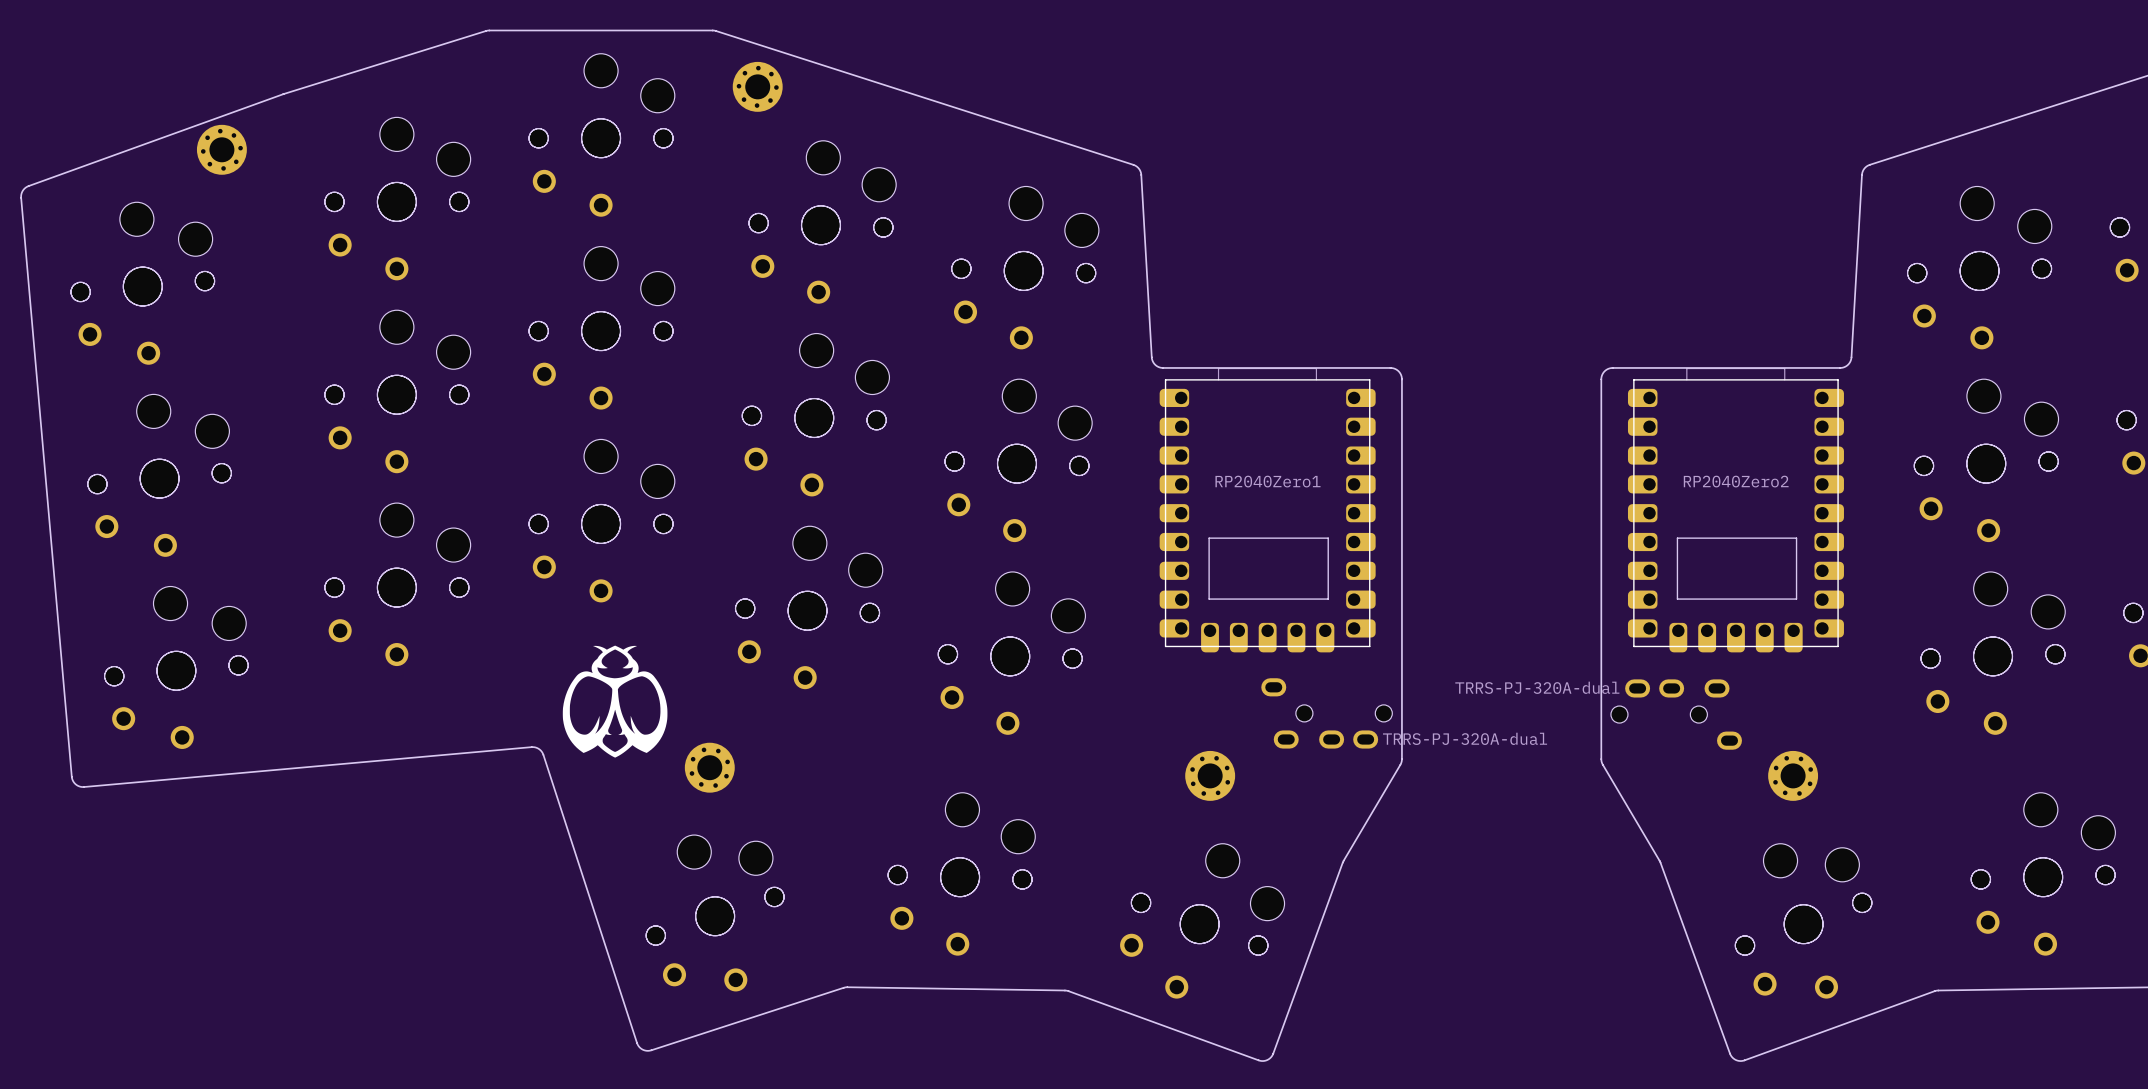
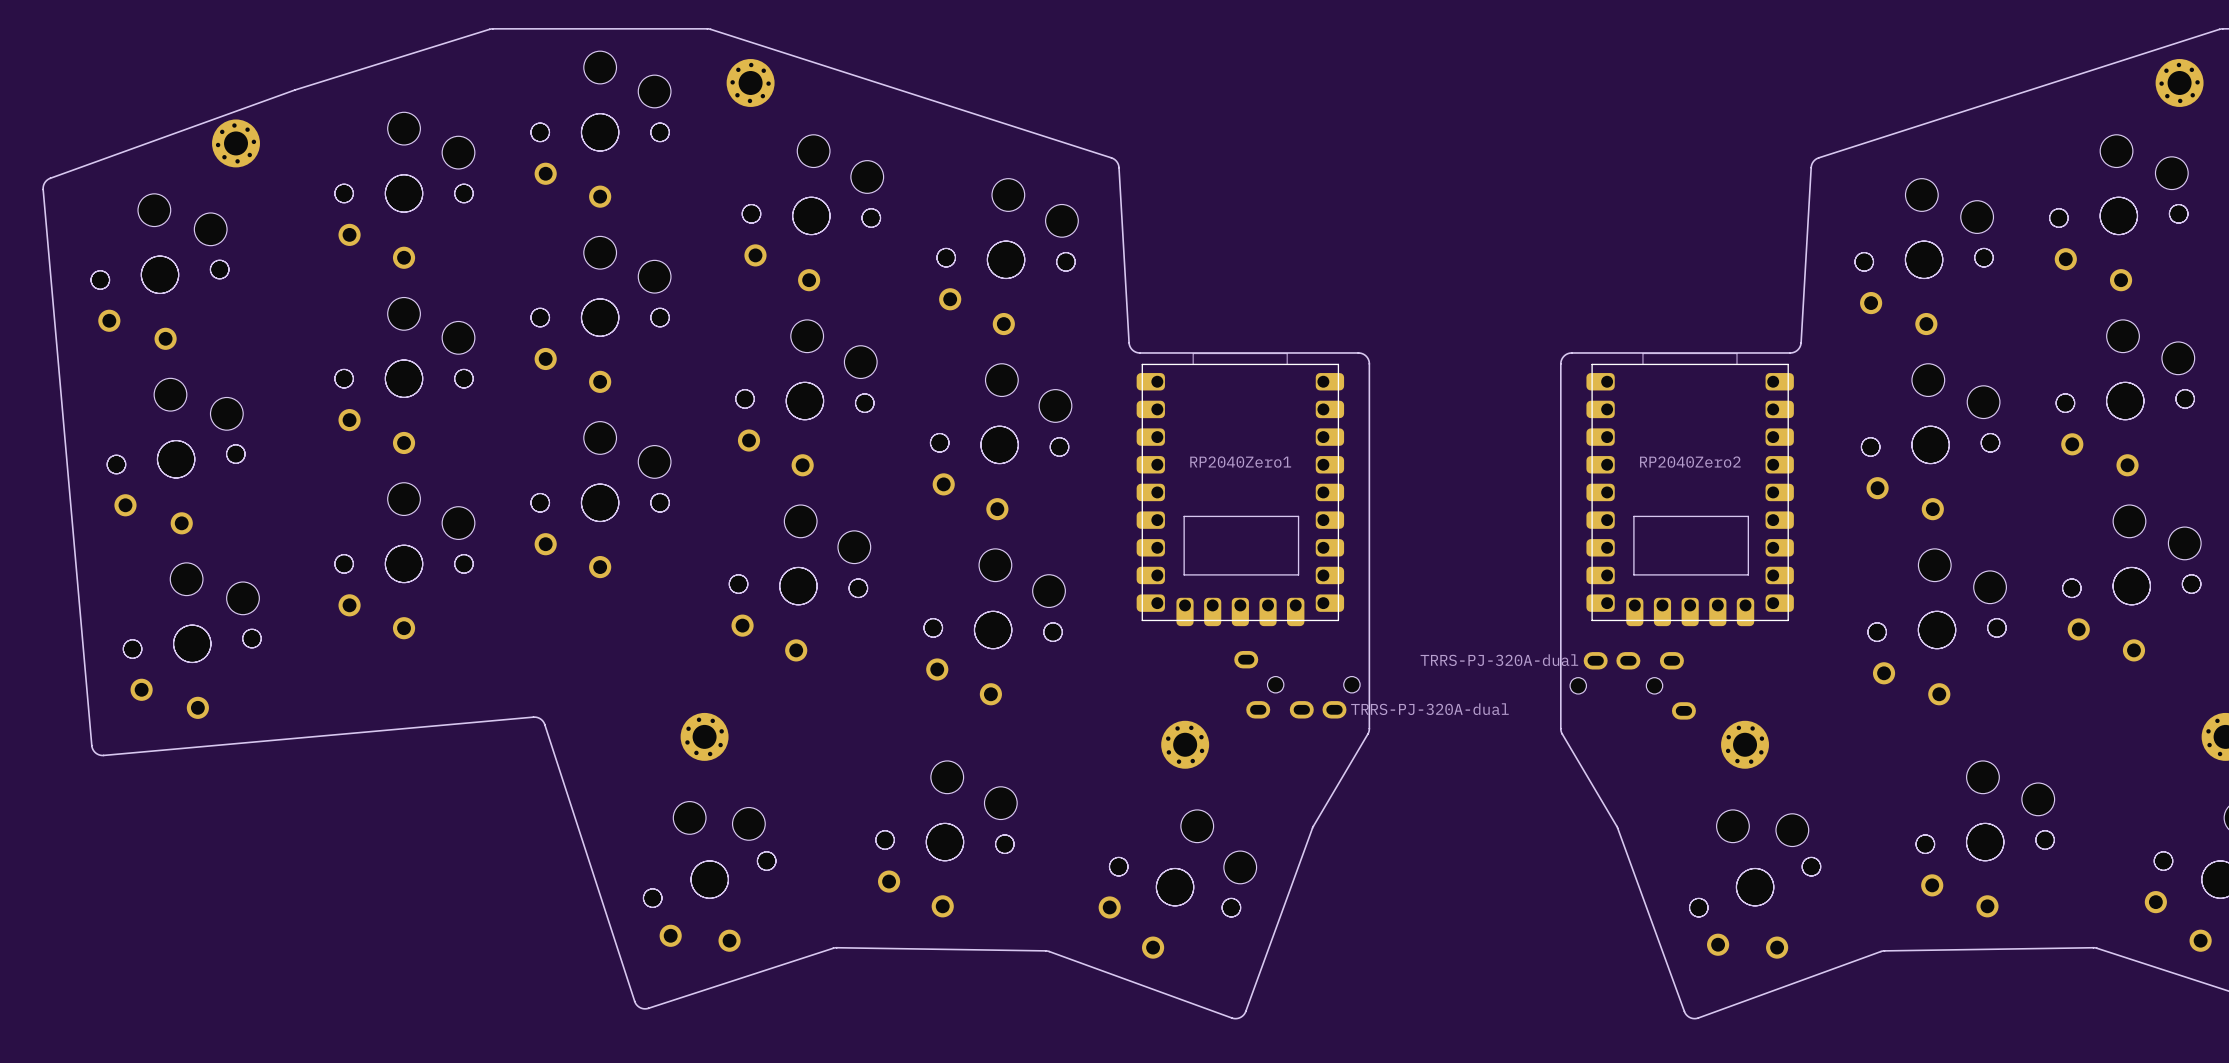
drawing: [562, 645, 668, 758] -> none

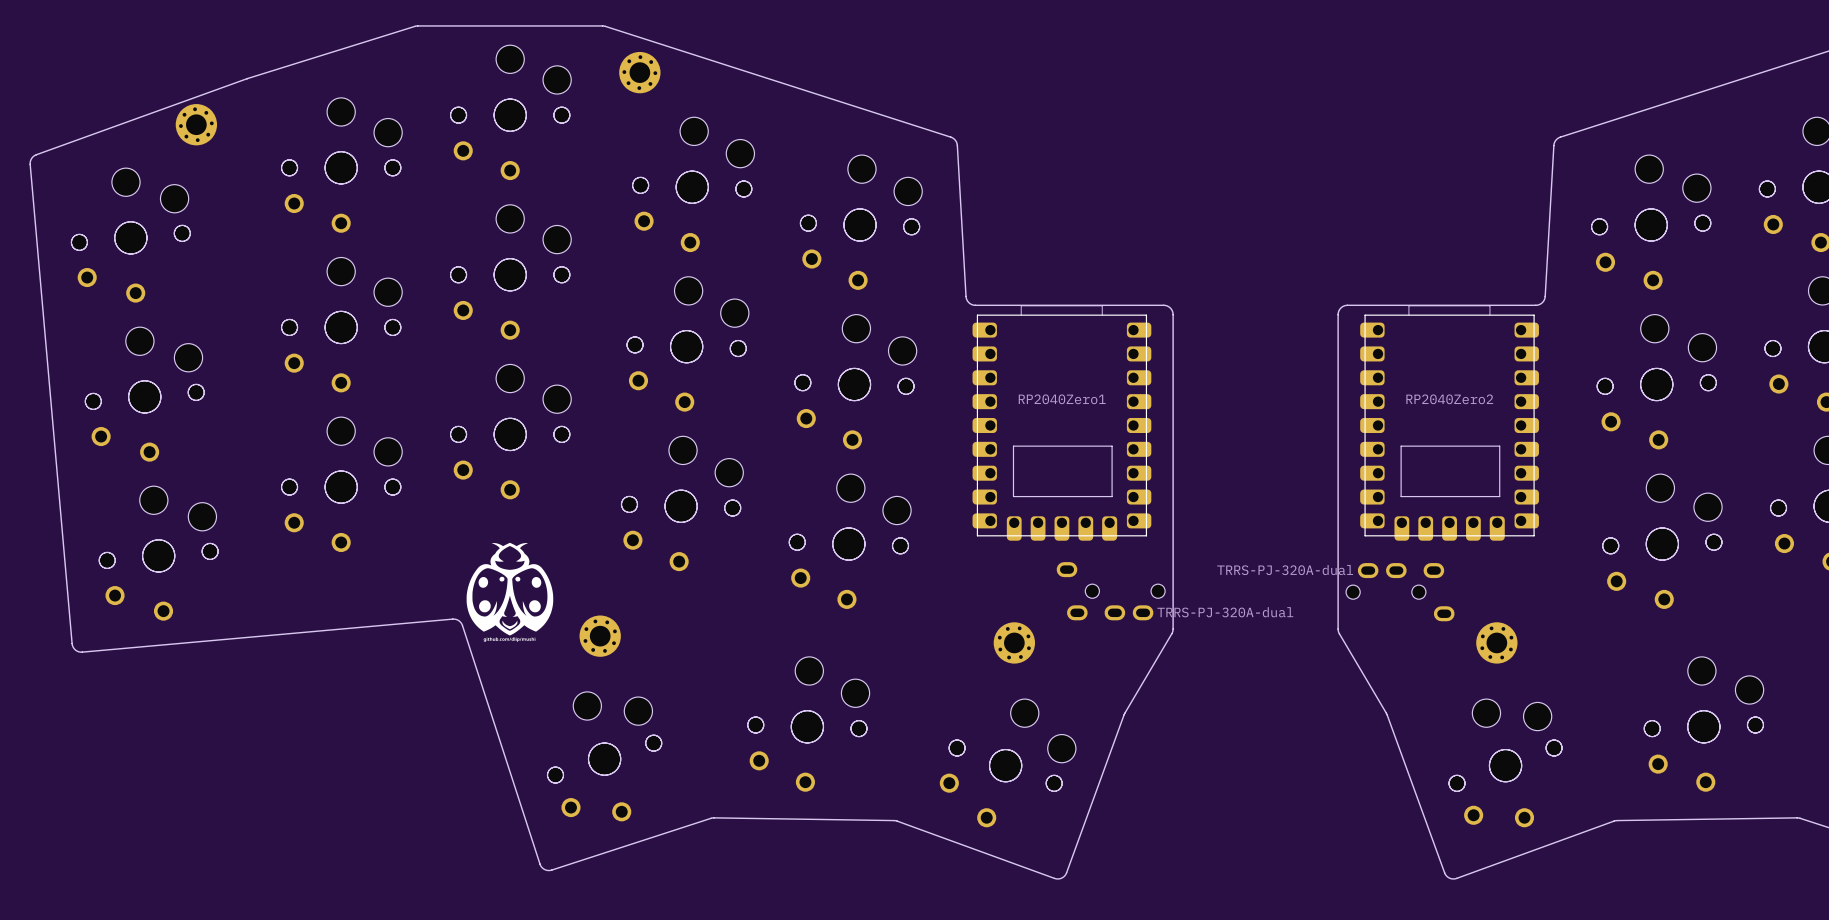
drawing: none -> [466, 542, 554, 642]

